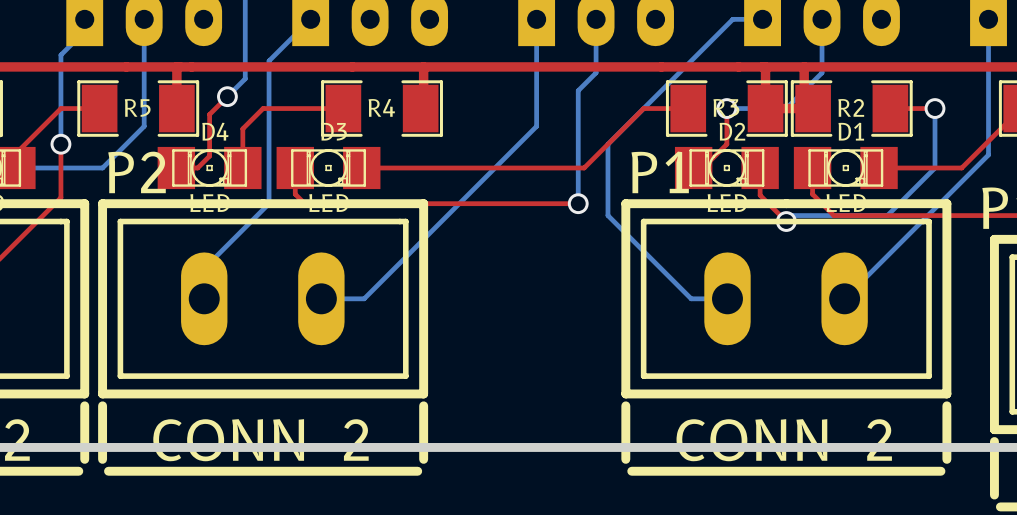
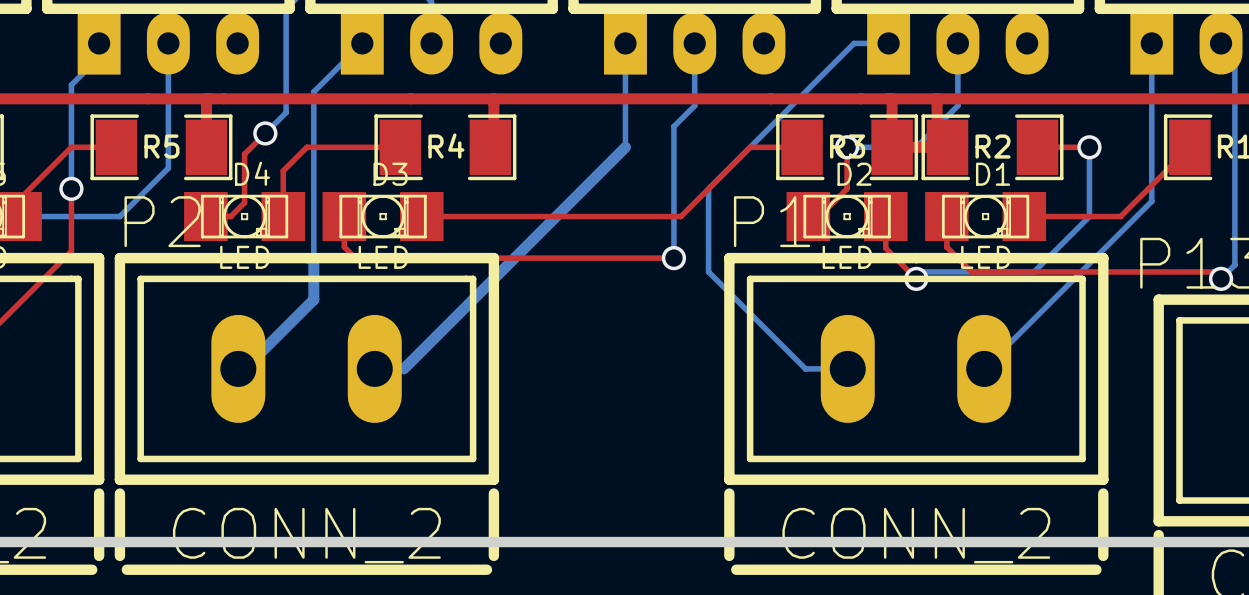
bottom track: (536, 108) (536, 126) (364, 298) (346, 298) -> (625, 147) (403, 368)
bottom track: (269, 203) (204, 268) (204, 298) -> (313, 258) (313, 299) (245, 368)

